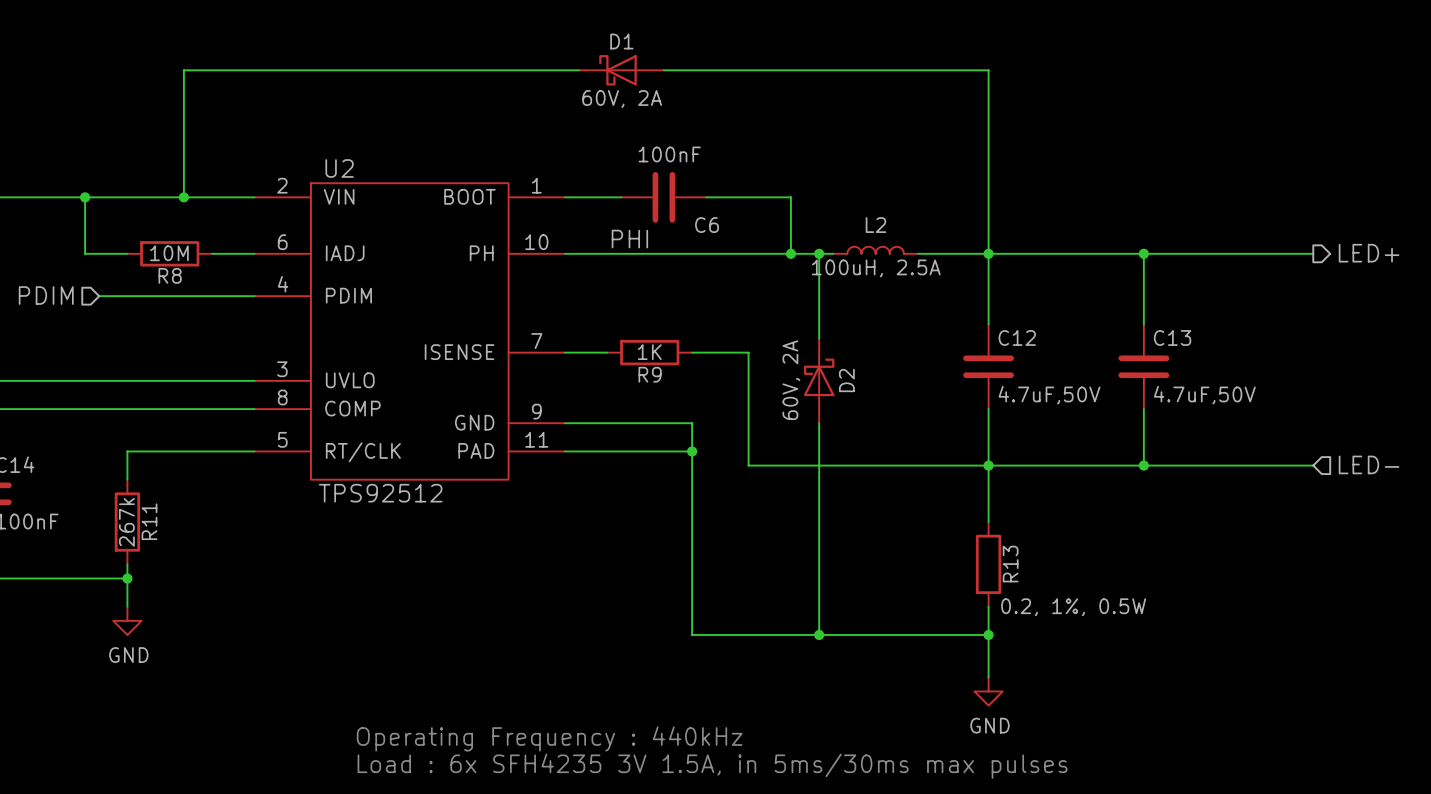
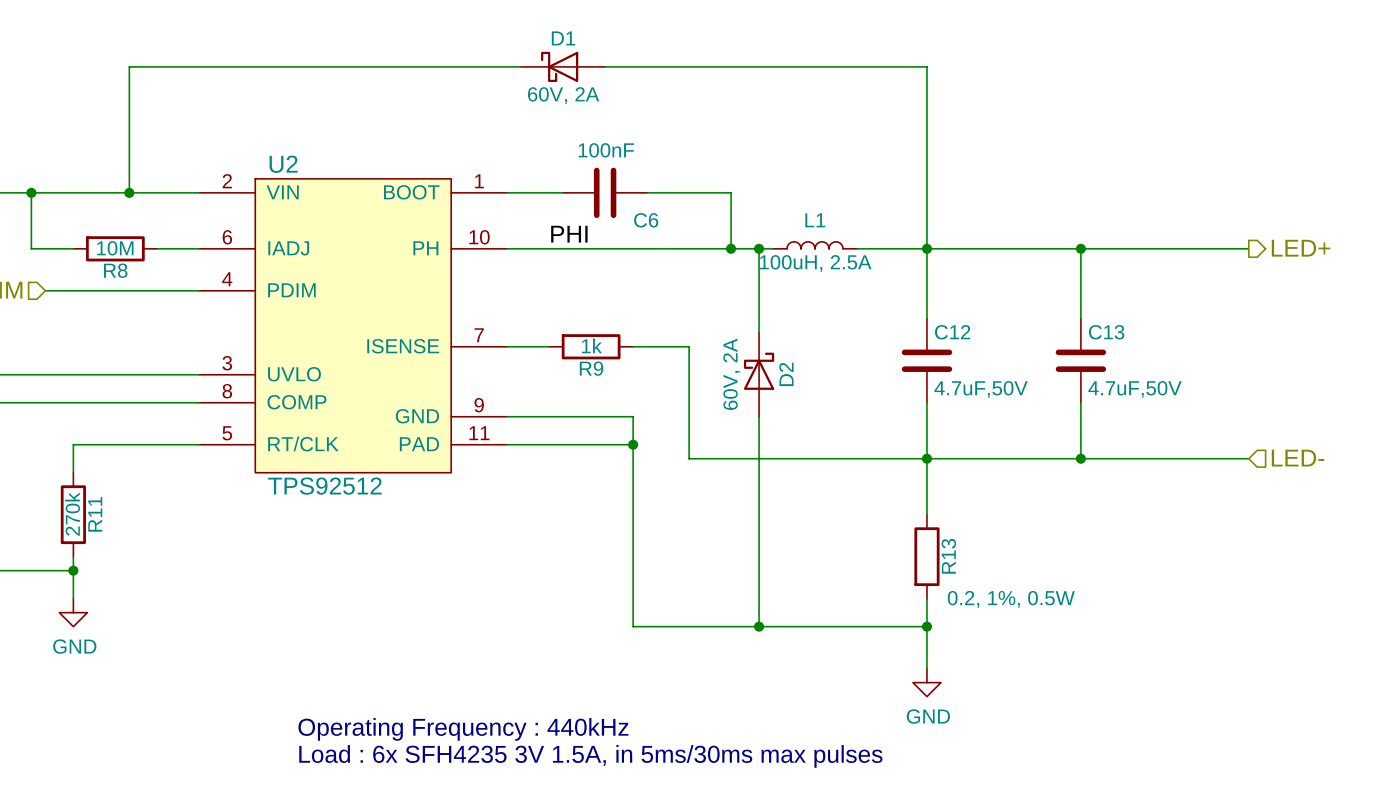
L2 name: L2 (875, 225) -> L1 (815, 220)
R9 value: 1K (649, 352) -> 1k (591, 345)
R11 value: 267k (126, 522) -> 270k (72, 514)

